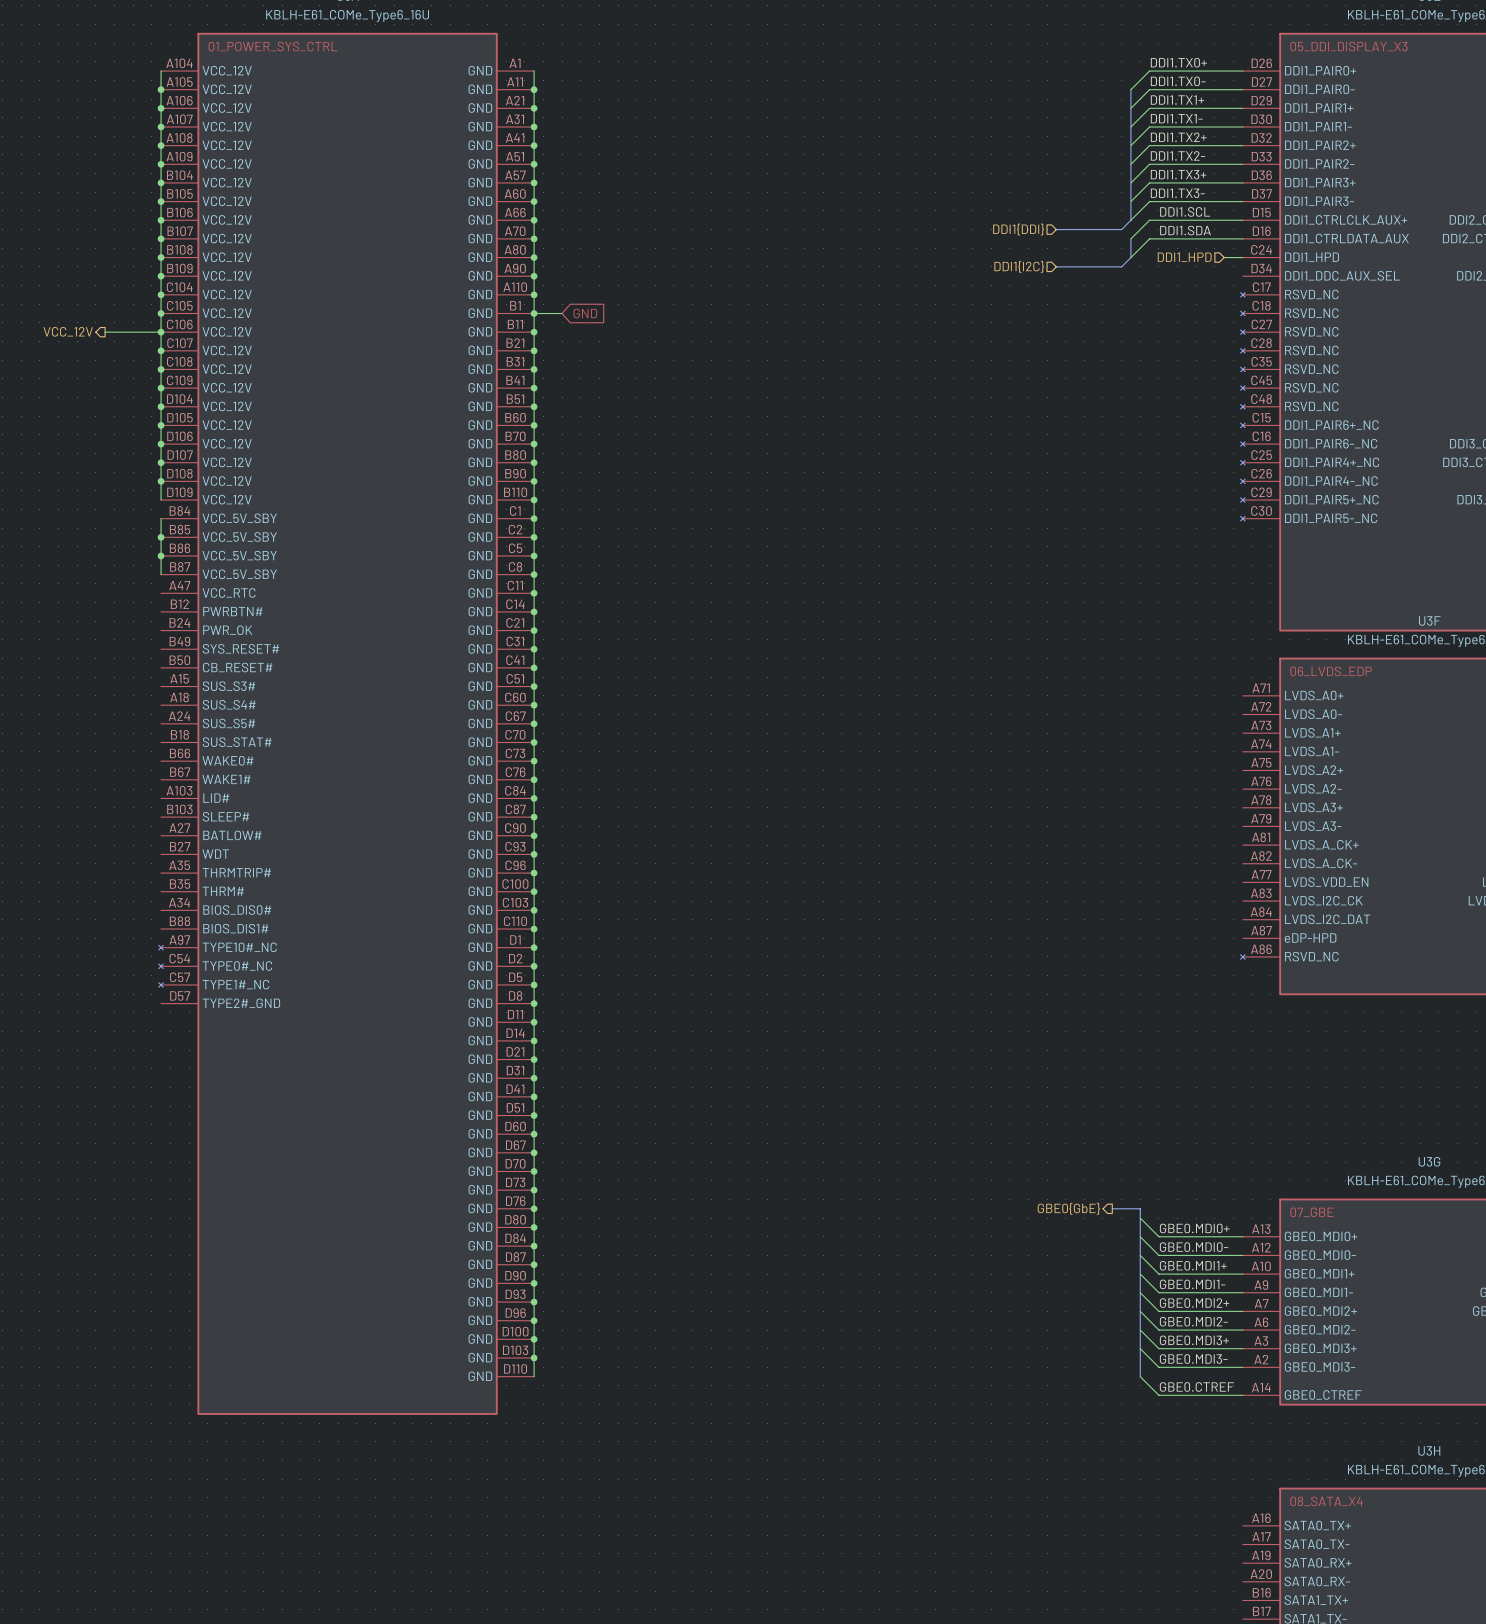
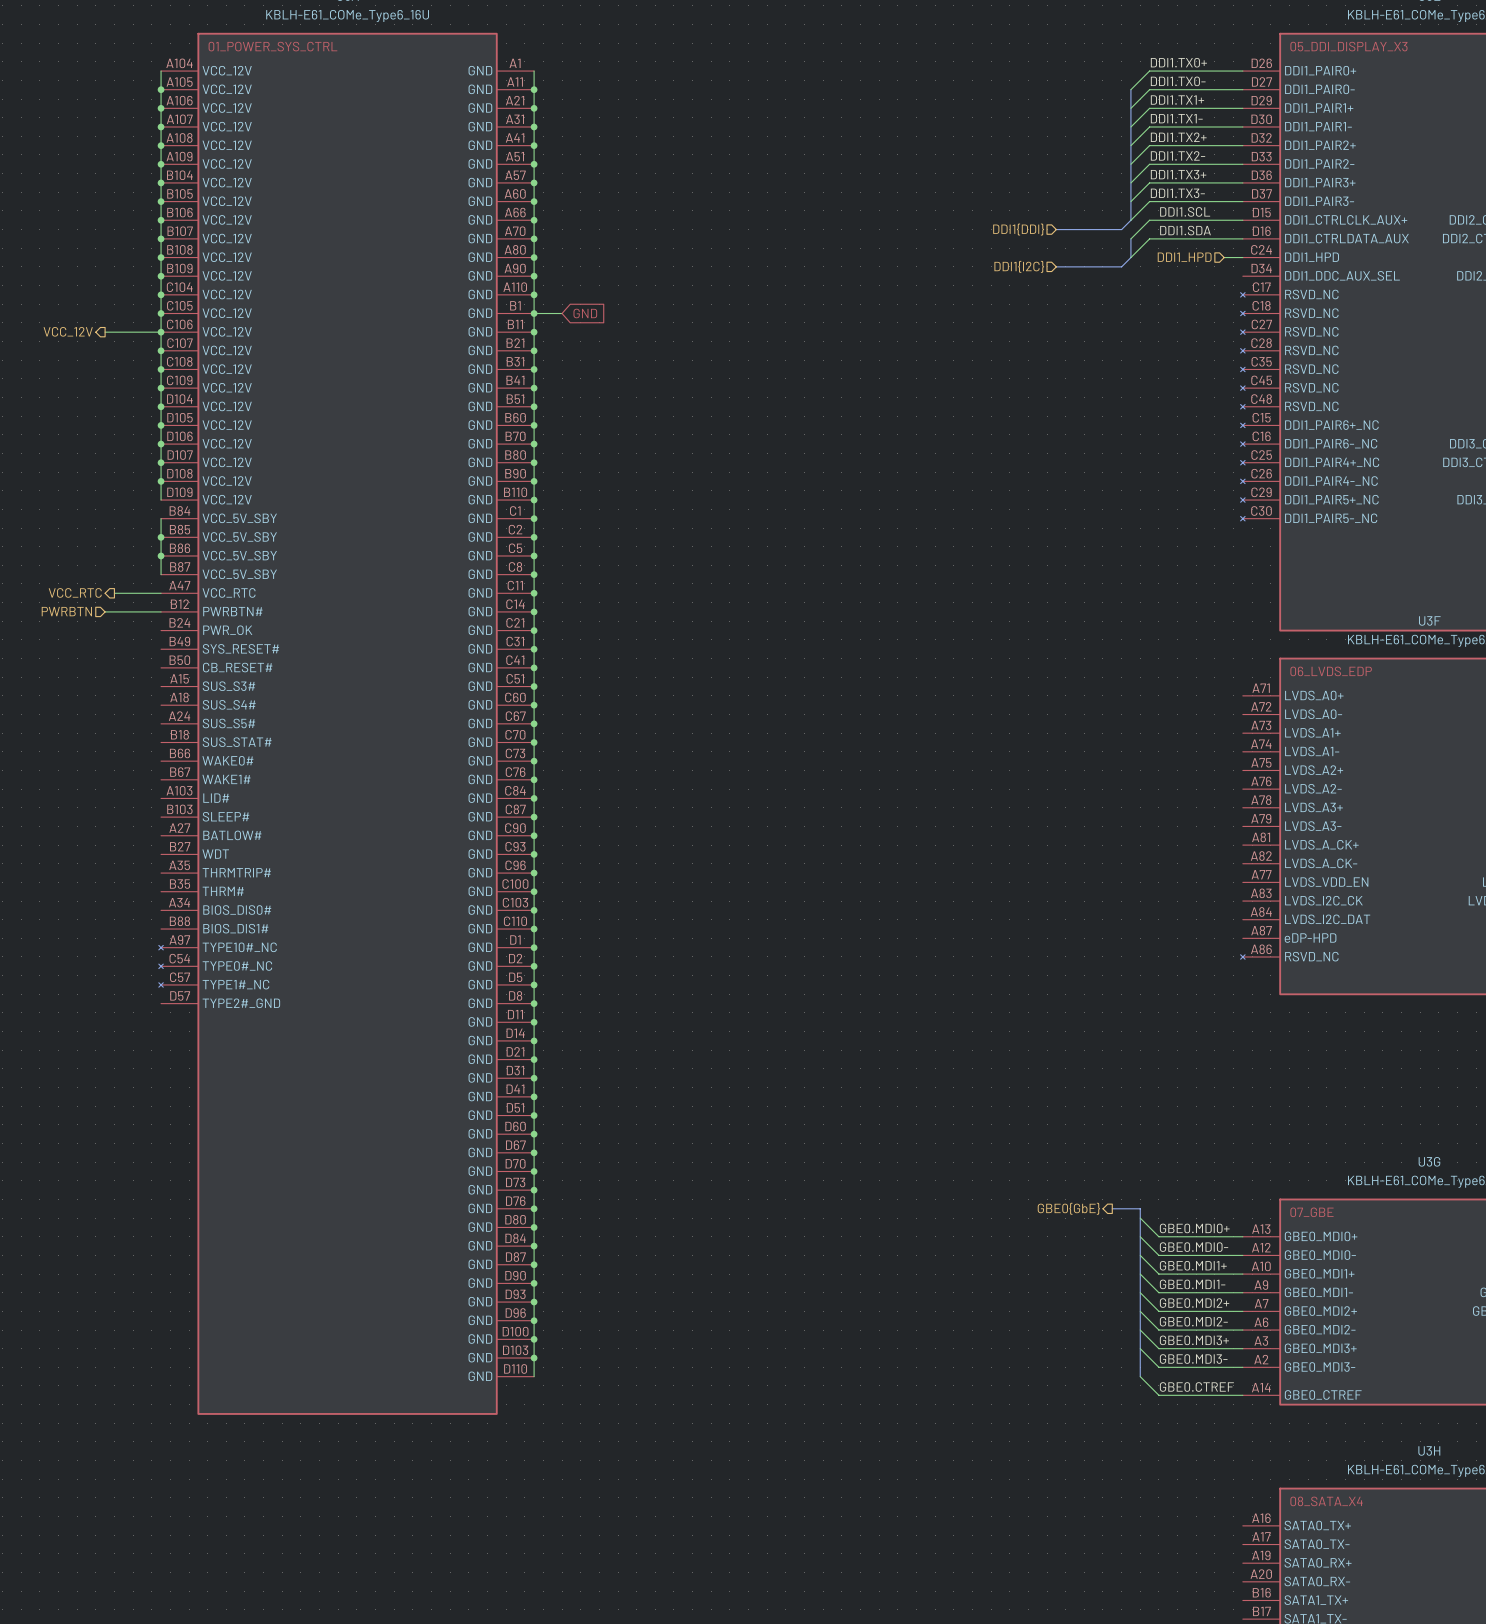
hierarchical label: none -> VCC_RTC (75, 592)
wire: none -> (114, 593) (161, 593)
hierarchical label: none -> PWRBTN (66, 611)
wire: none -> (105, 611) (161, 611)

